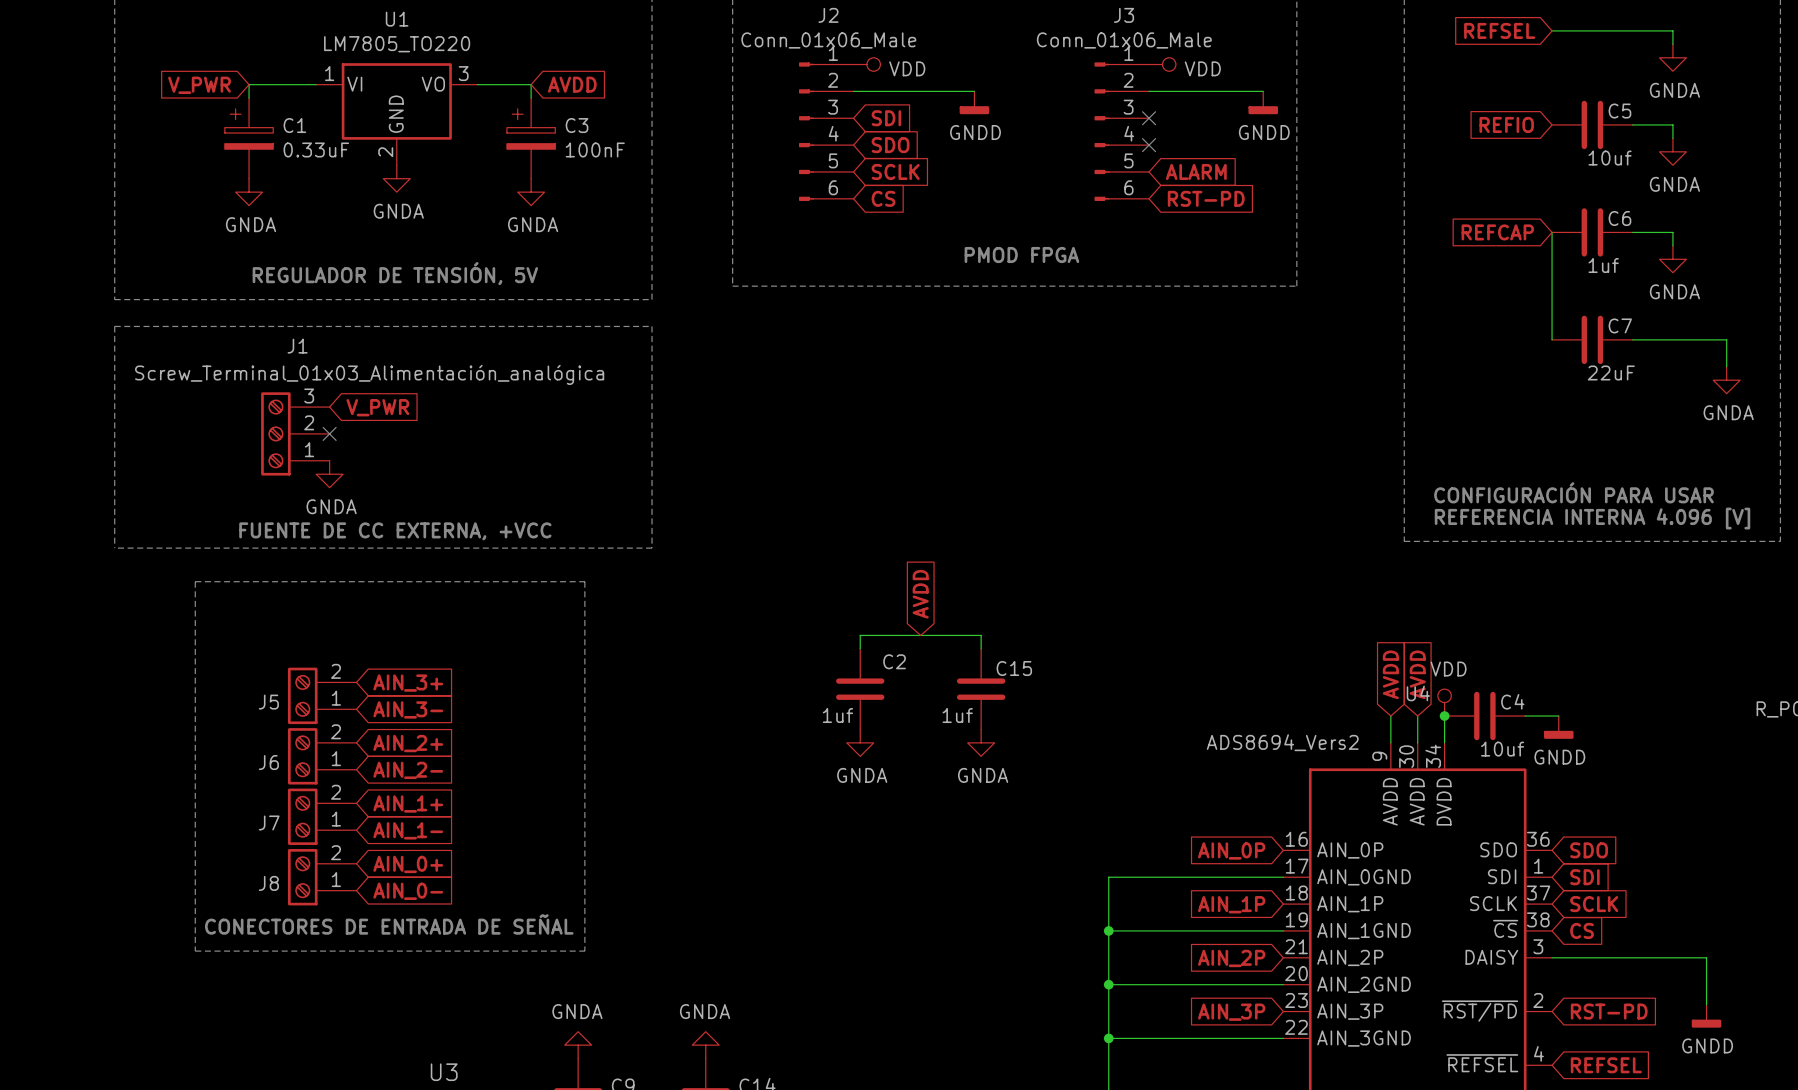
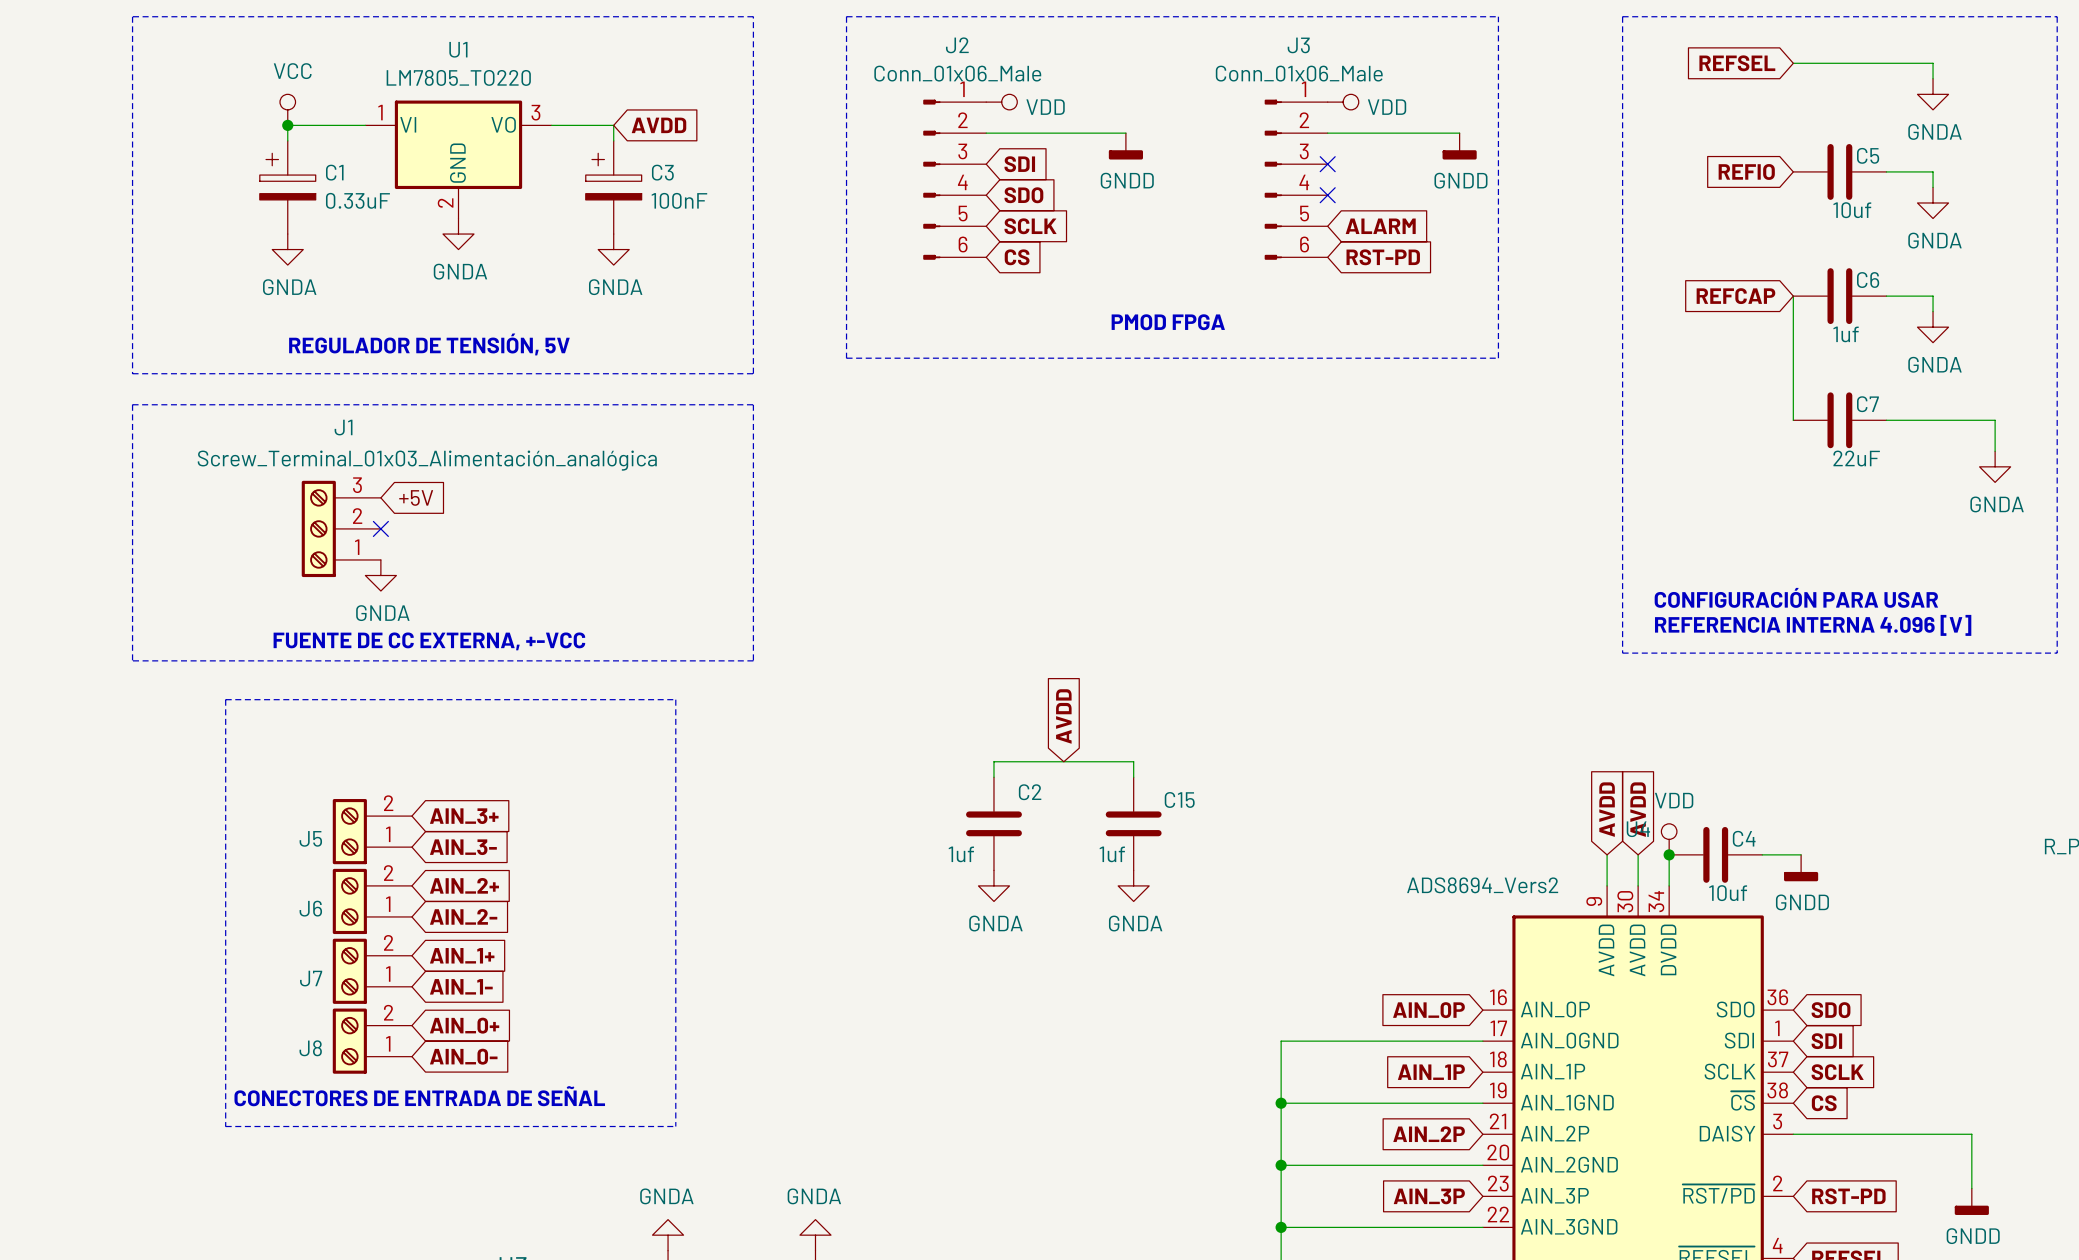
power symbol: none -> VCC (287, 109)
junction: none -> (287, 125)
global label: V_PWR (199, 85) -> none
global label: V_PWR (377, 407) -> +5V (416, 497)
text: FUENTE DE CC EXTERNA, +VCC (395, 531) -> FUENTE DE CC EXTERNA, +-VCC (429, 641)

